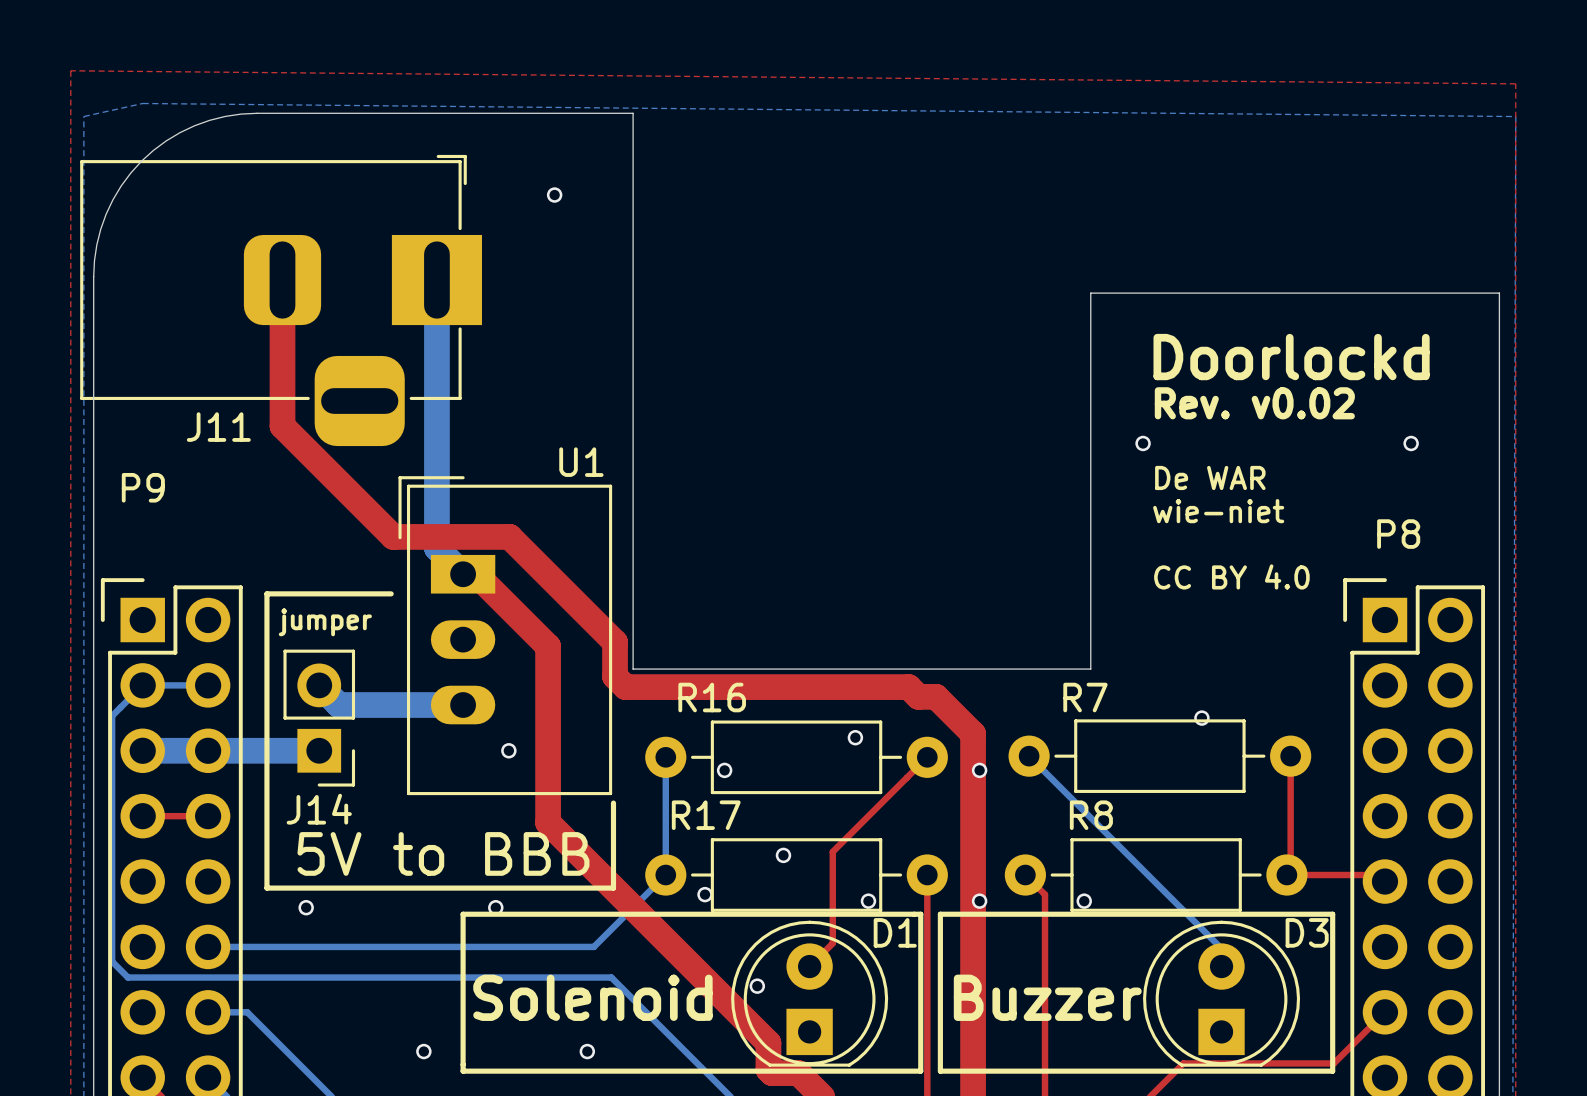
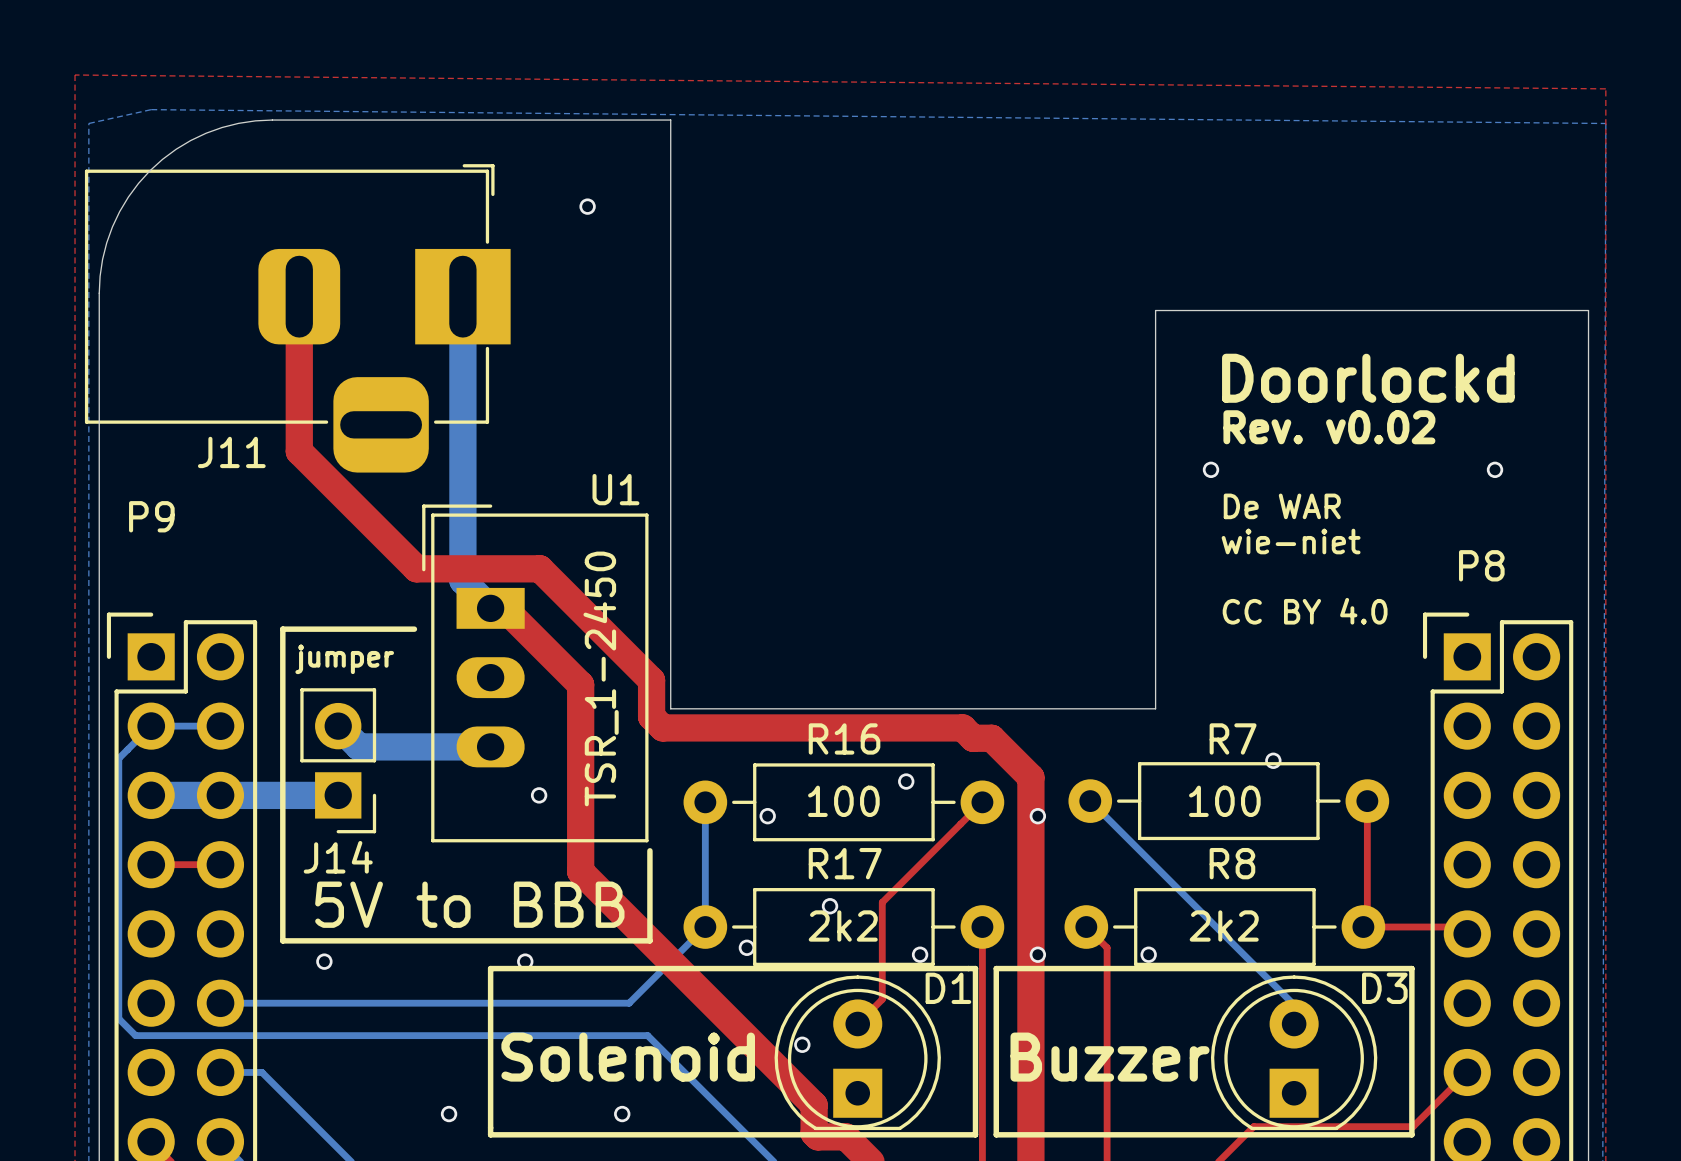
U1 value: none -> TSR_1-2450 (601, 678)
R16 name position: R16 (712, 697) -> R16 (844, 738)
R7 name position: R7 (1085, 697) -> R7 (1233, 738)
R16 value: none -> 100 (843, 801)
R7 value: none -> 100 (1224, 801)
R17 name position: R17 (706, 815) -> R17 (845, 863)
R8 name position: R8 (1091, 815) -> R8 (1232, 863)
R17 value: none -> 2k2 (843, 925)
R8 value: none -> 2k2 (1224, 925)

